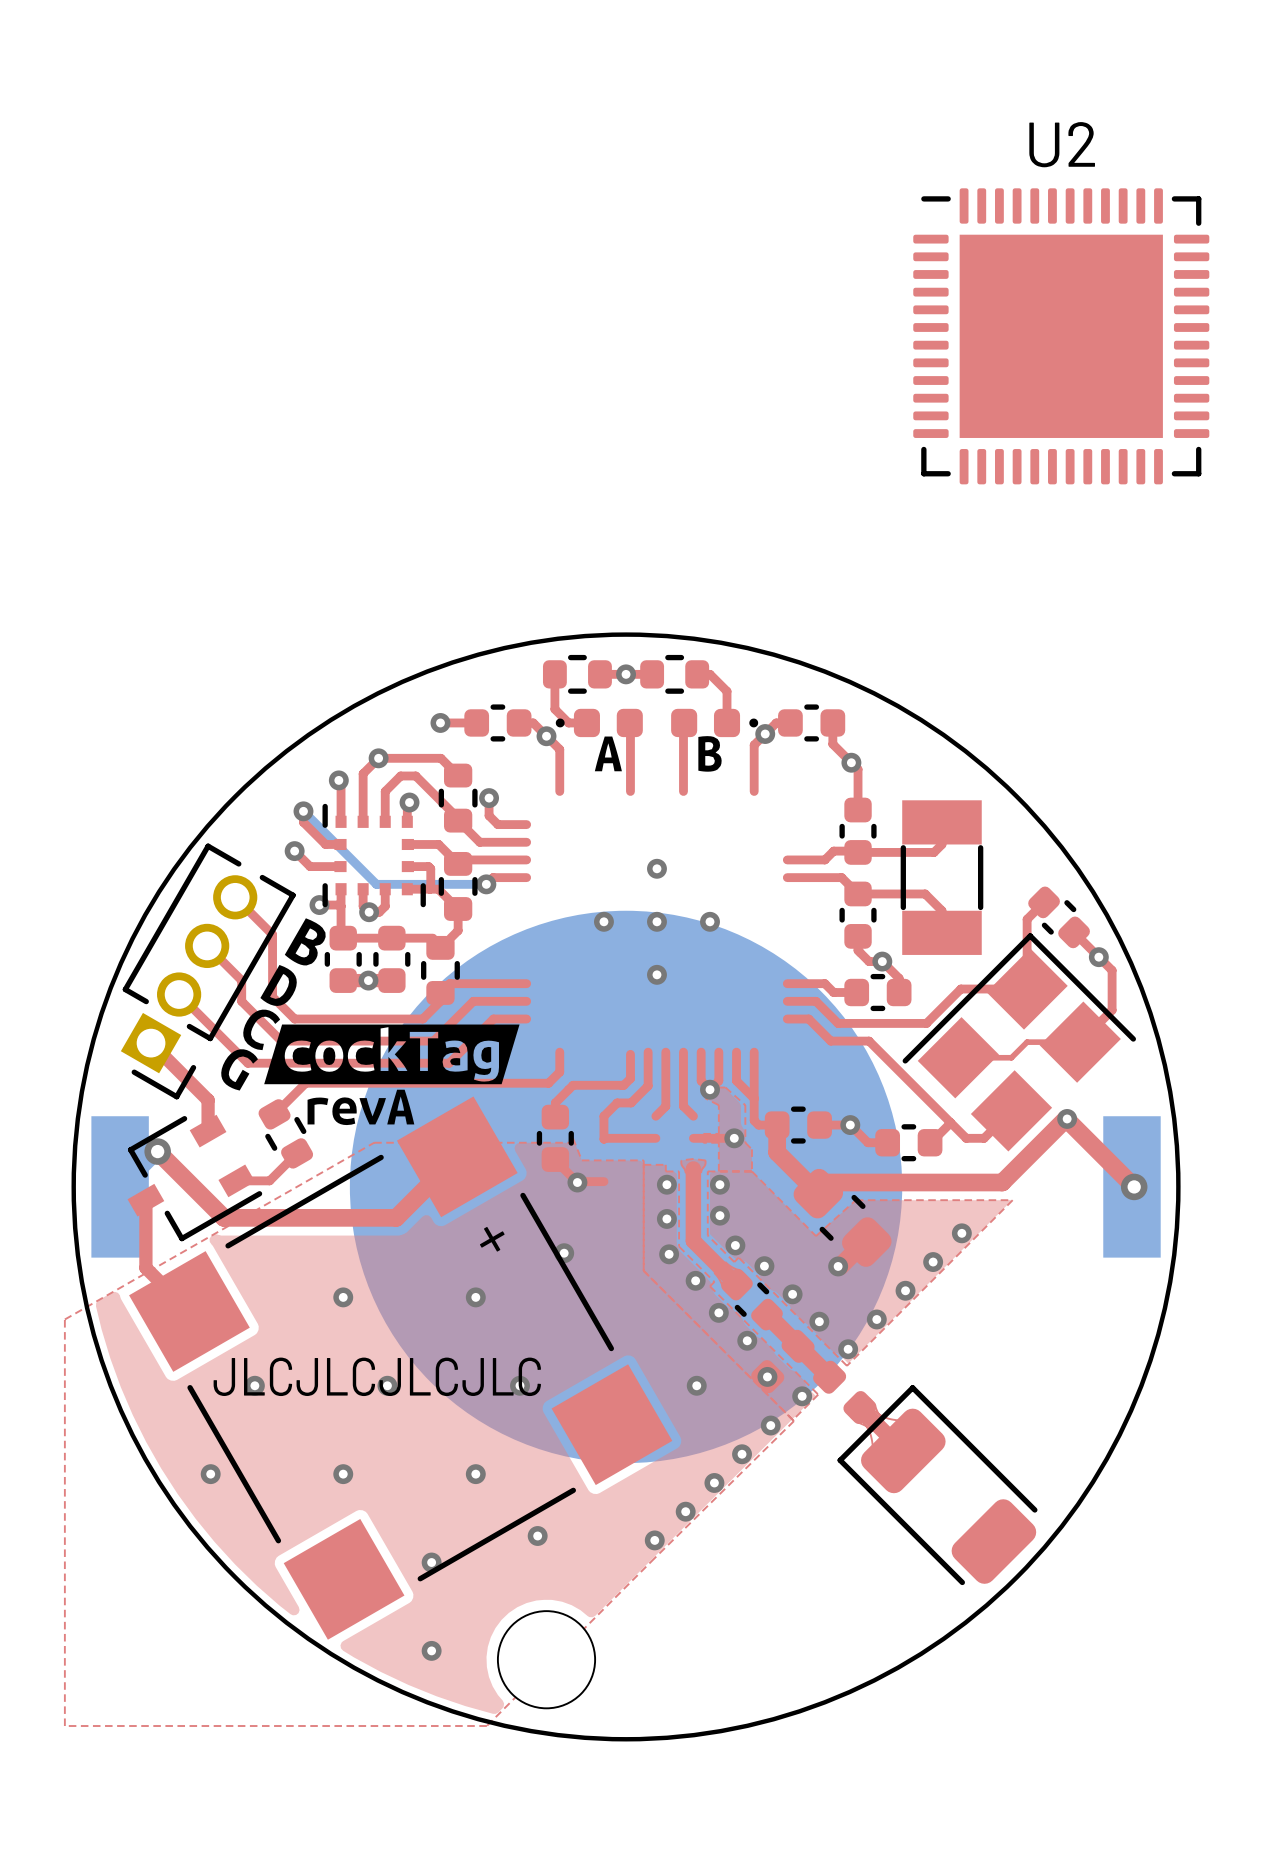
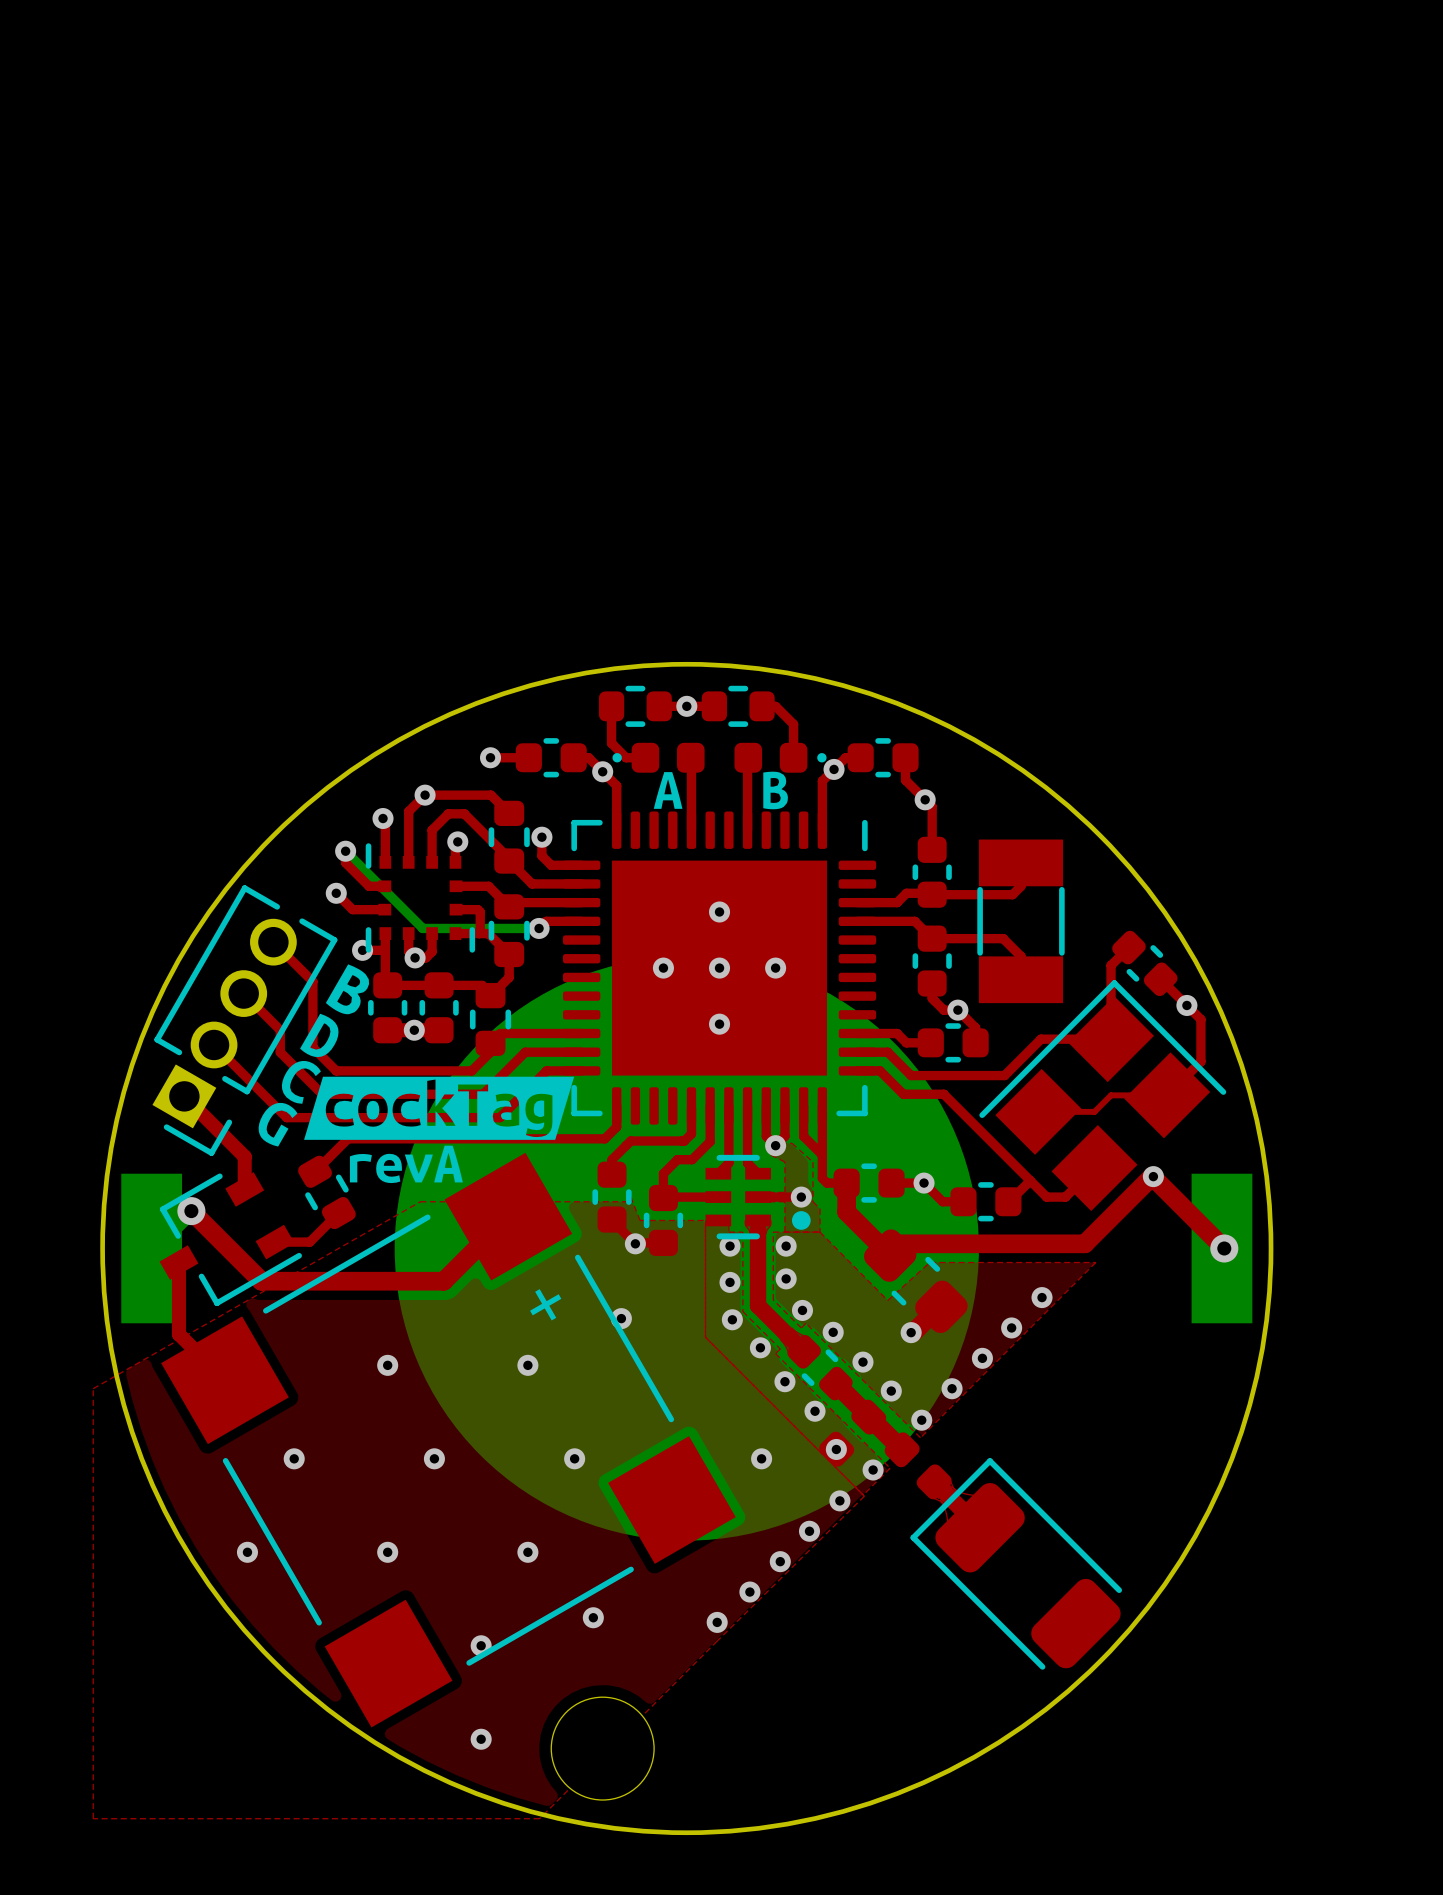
U2: (1061, 336) -> none
part: none -> (719, 968)
part: none -> (758, 1197)
part: none -> (663, 1220)
text: JLCJLCJLCJLC (377, 1376) -> none

